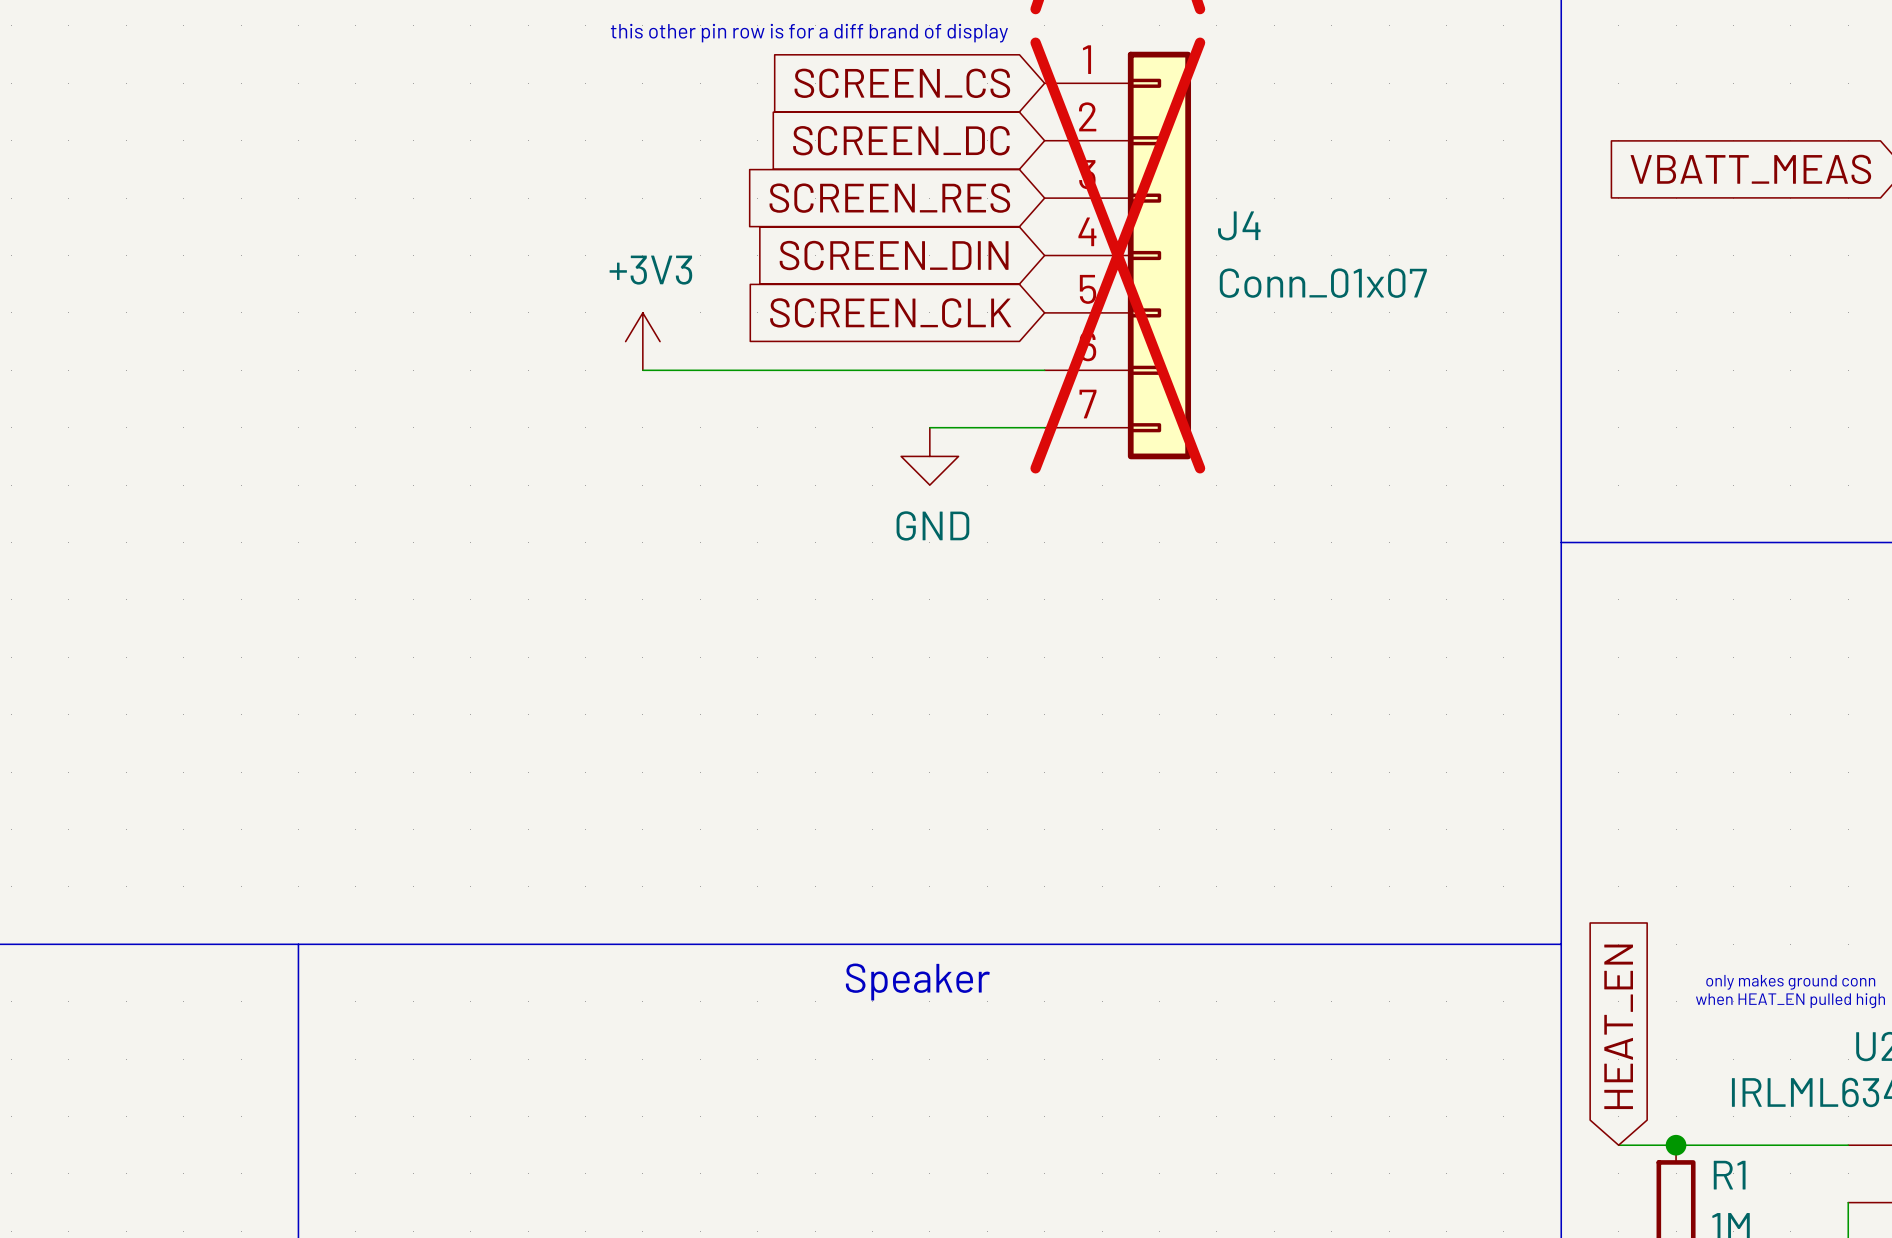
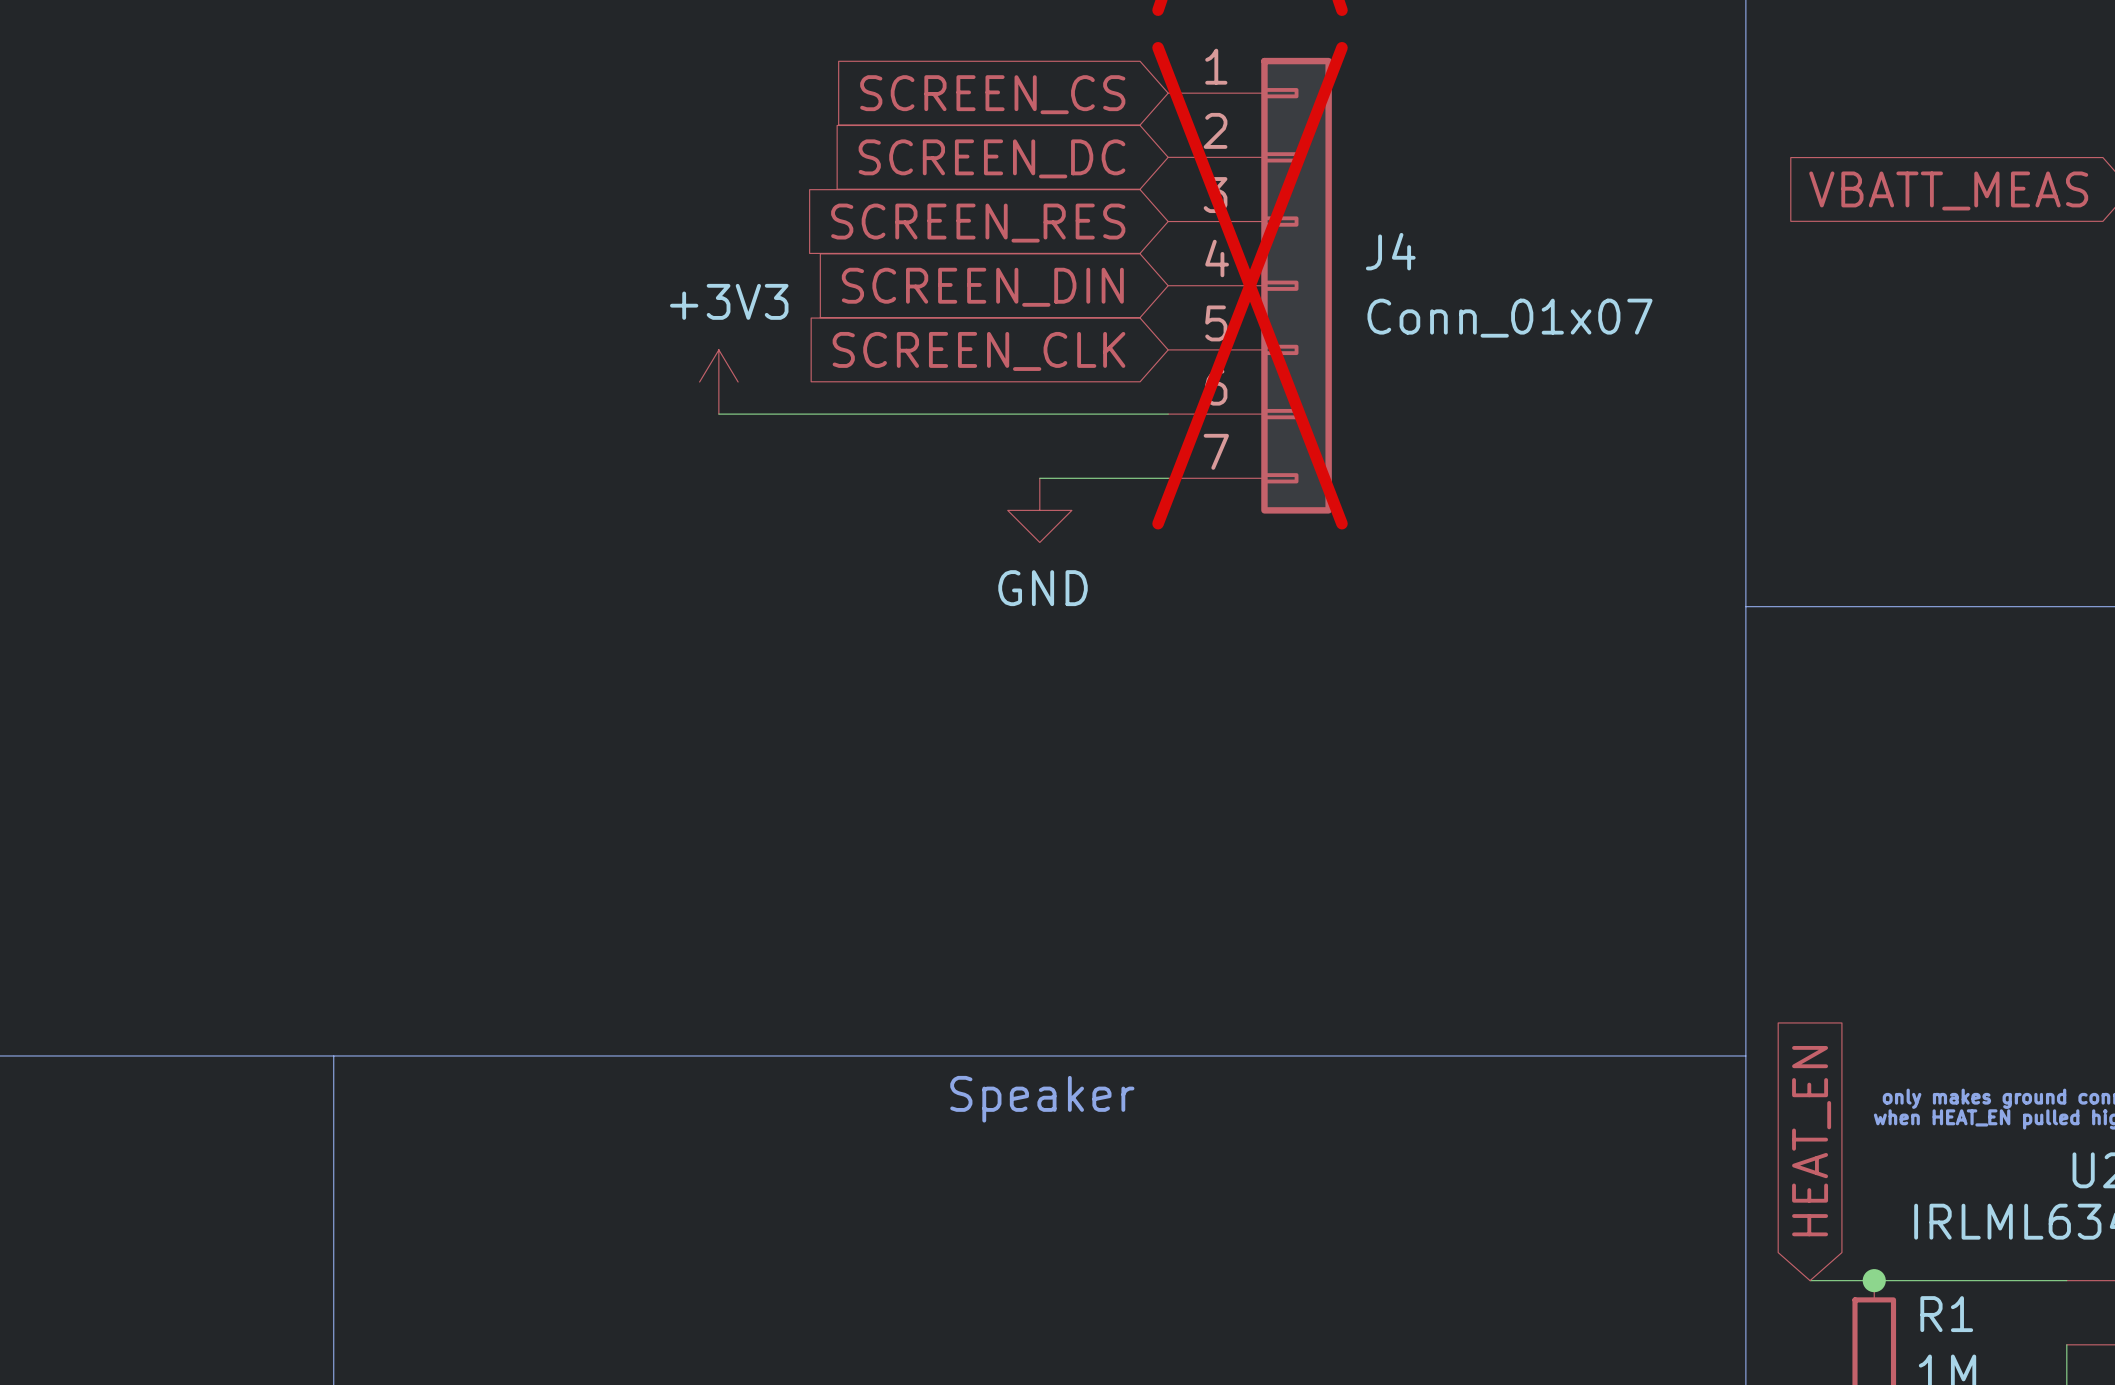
text: this other pin row is for a diff brand of display (809, 33) -> none

